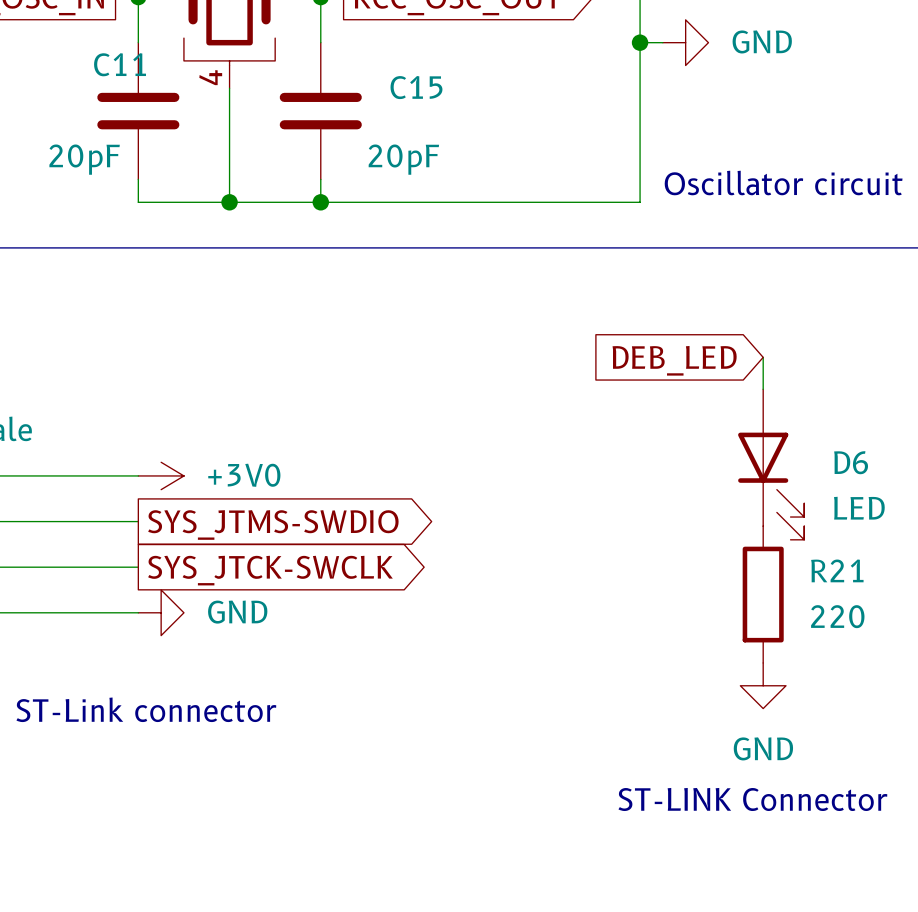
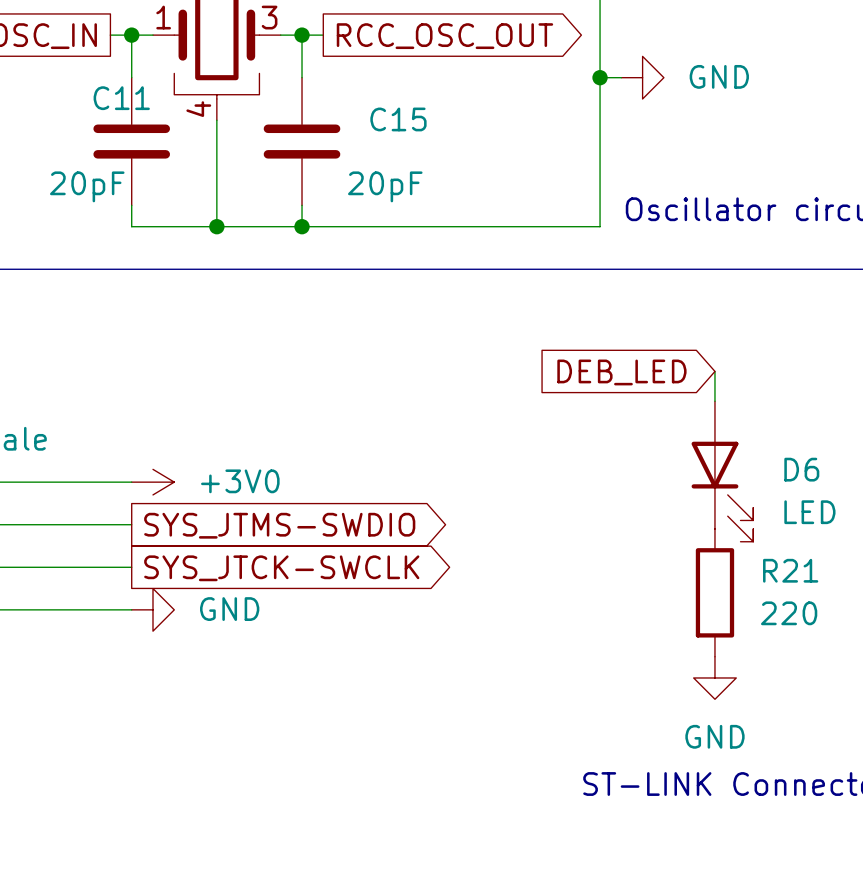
text: ST-Link connector (146, 709) -> none

